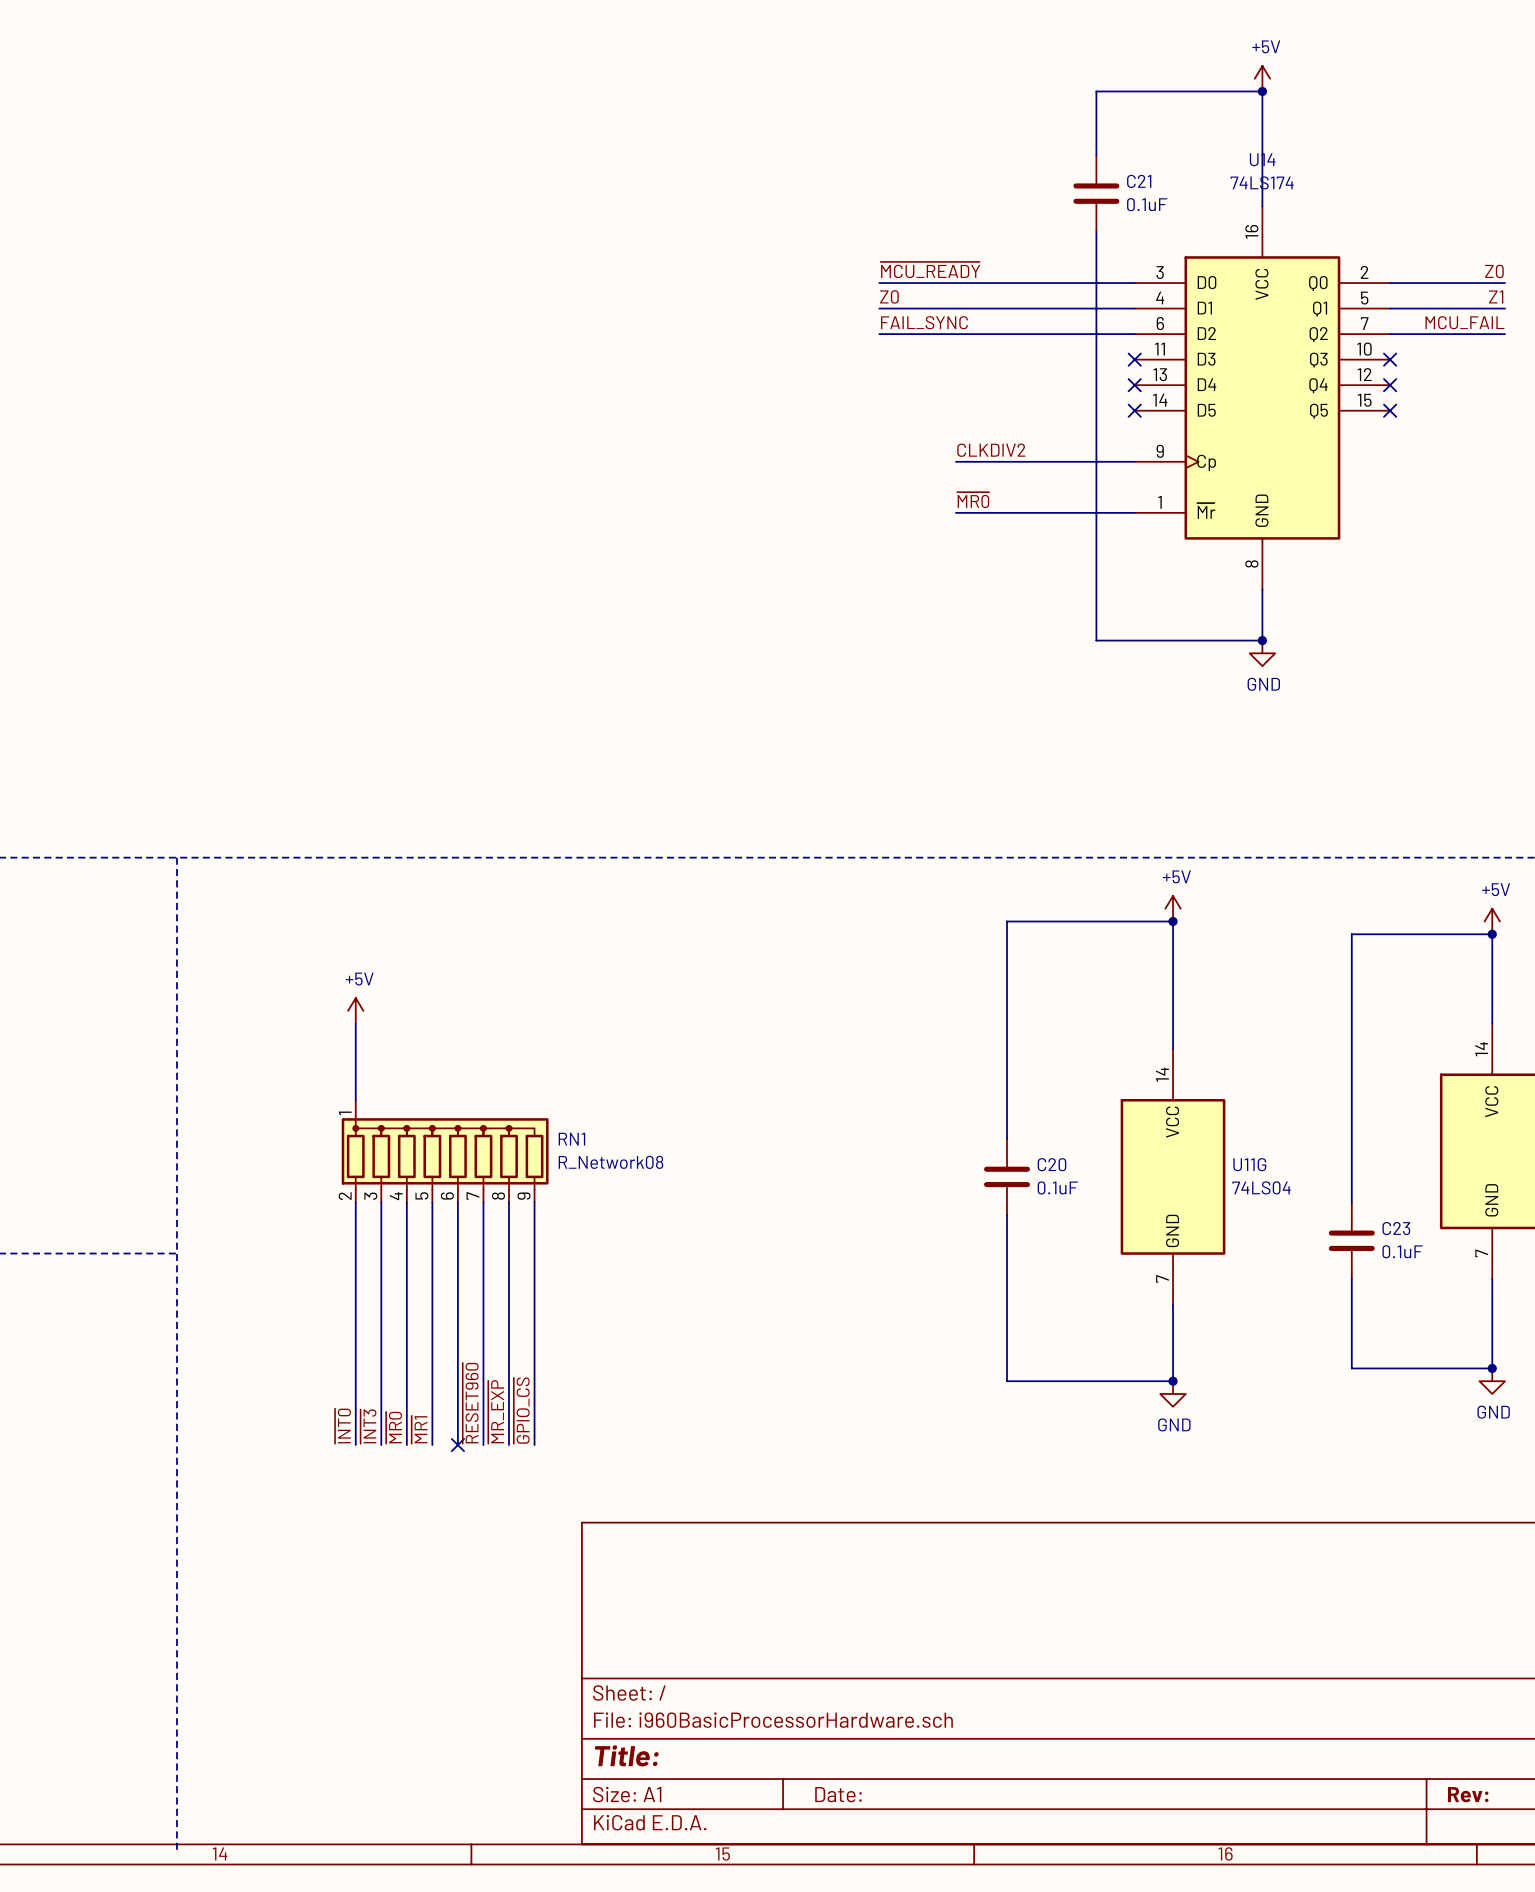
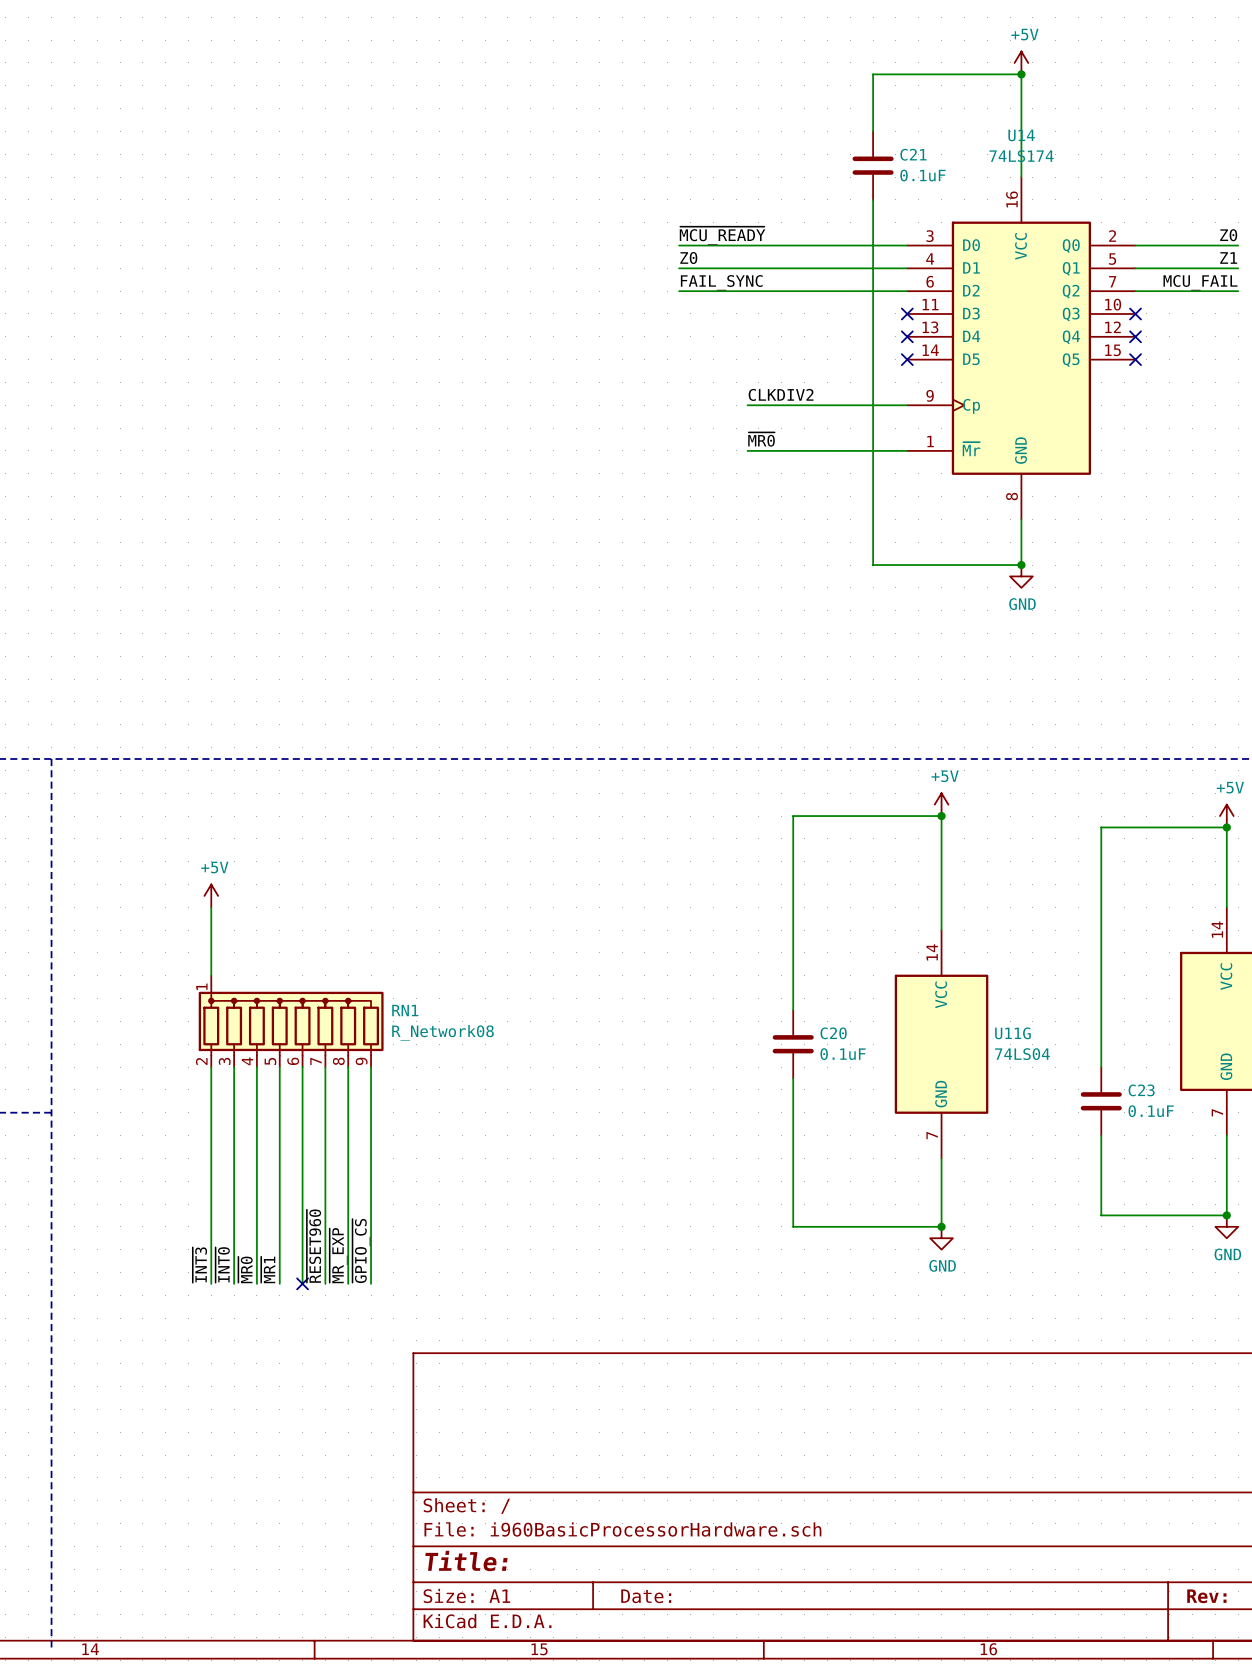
label: ~{INT0} (342, 1426) -> ~{INT3} (199, 1265)
label: ~{INT3} (368, 1426) -> ~{INT0} (222, 1264)

